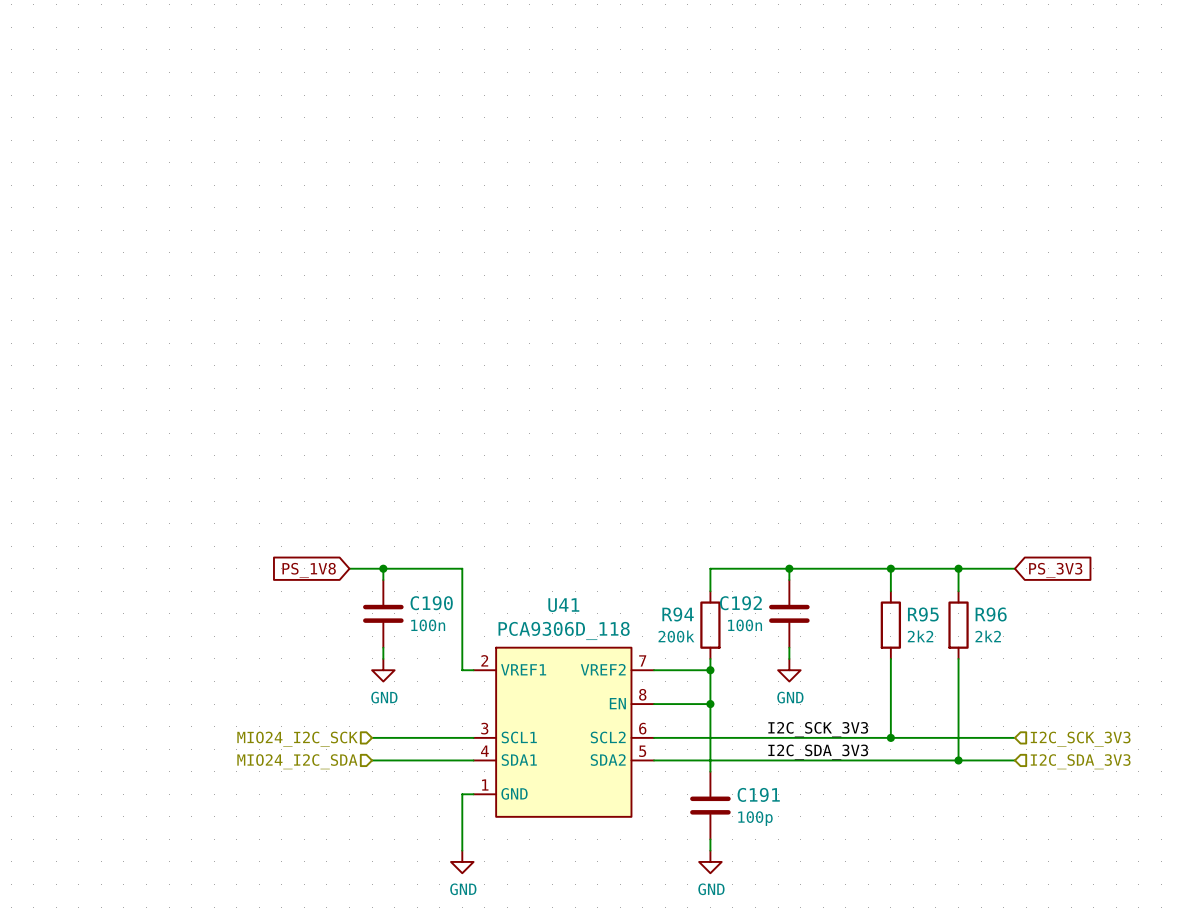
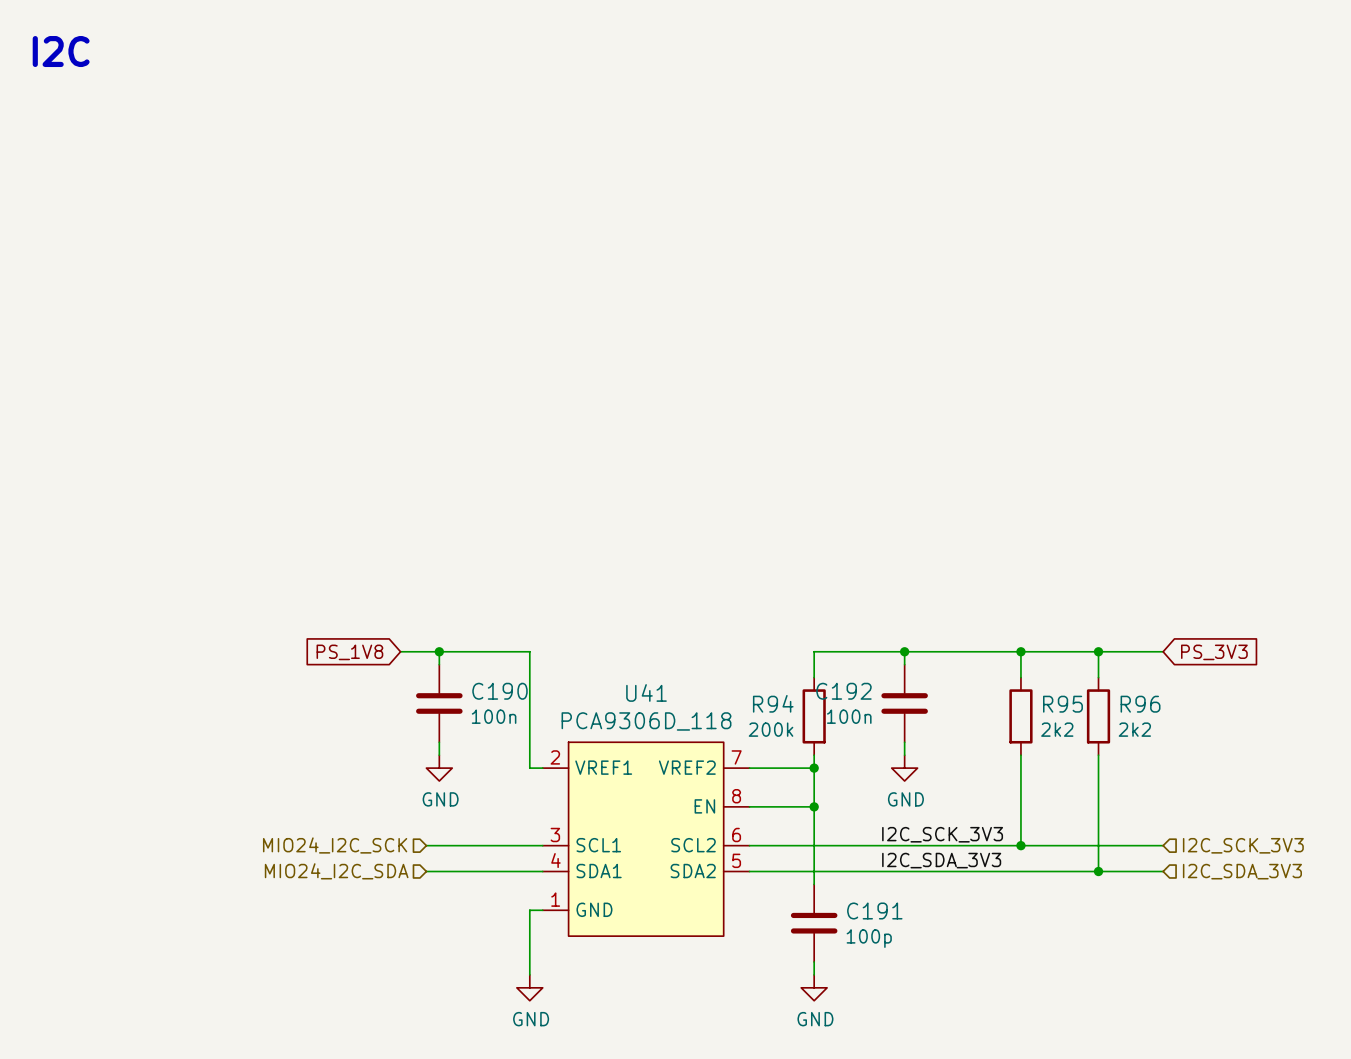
text: none -> I2C (61, 51)

